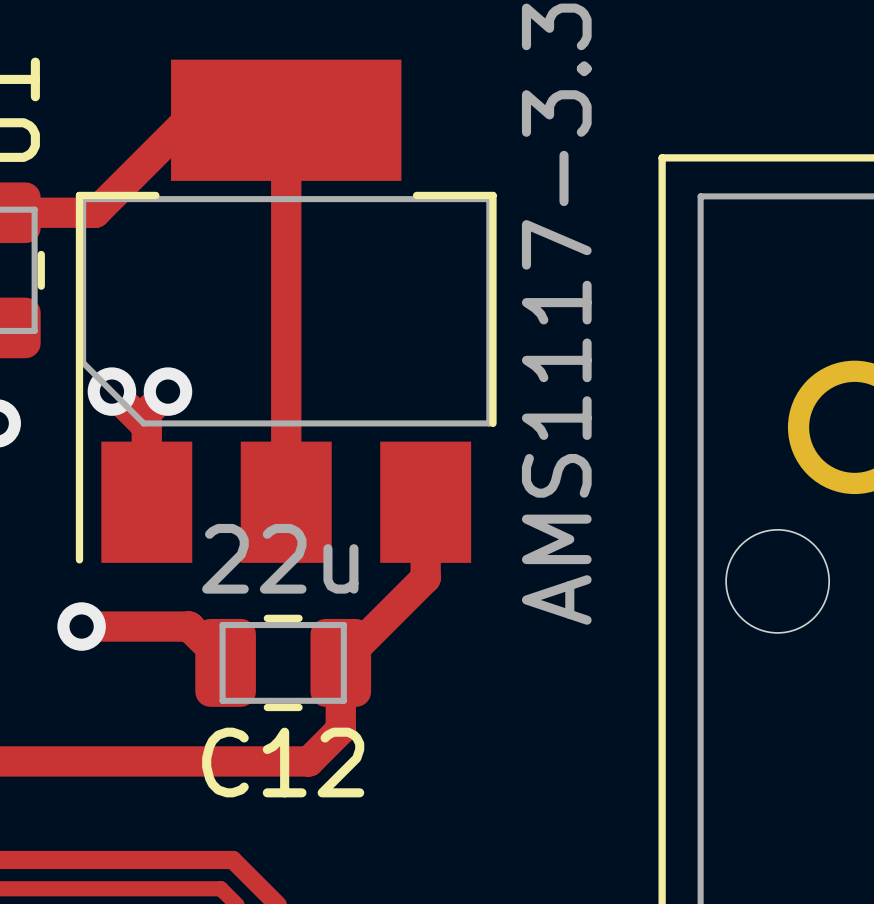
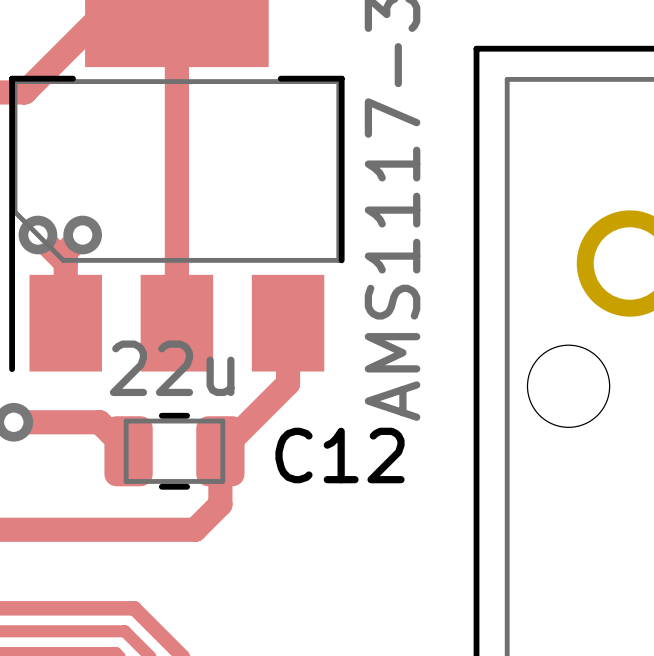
C12 name position: C12 (283, 762) -> C12 (339, 455)

